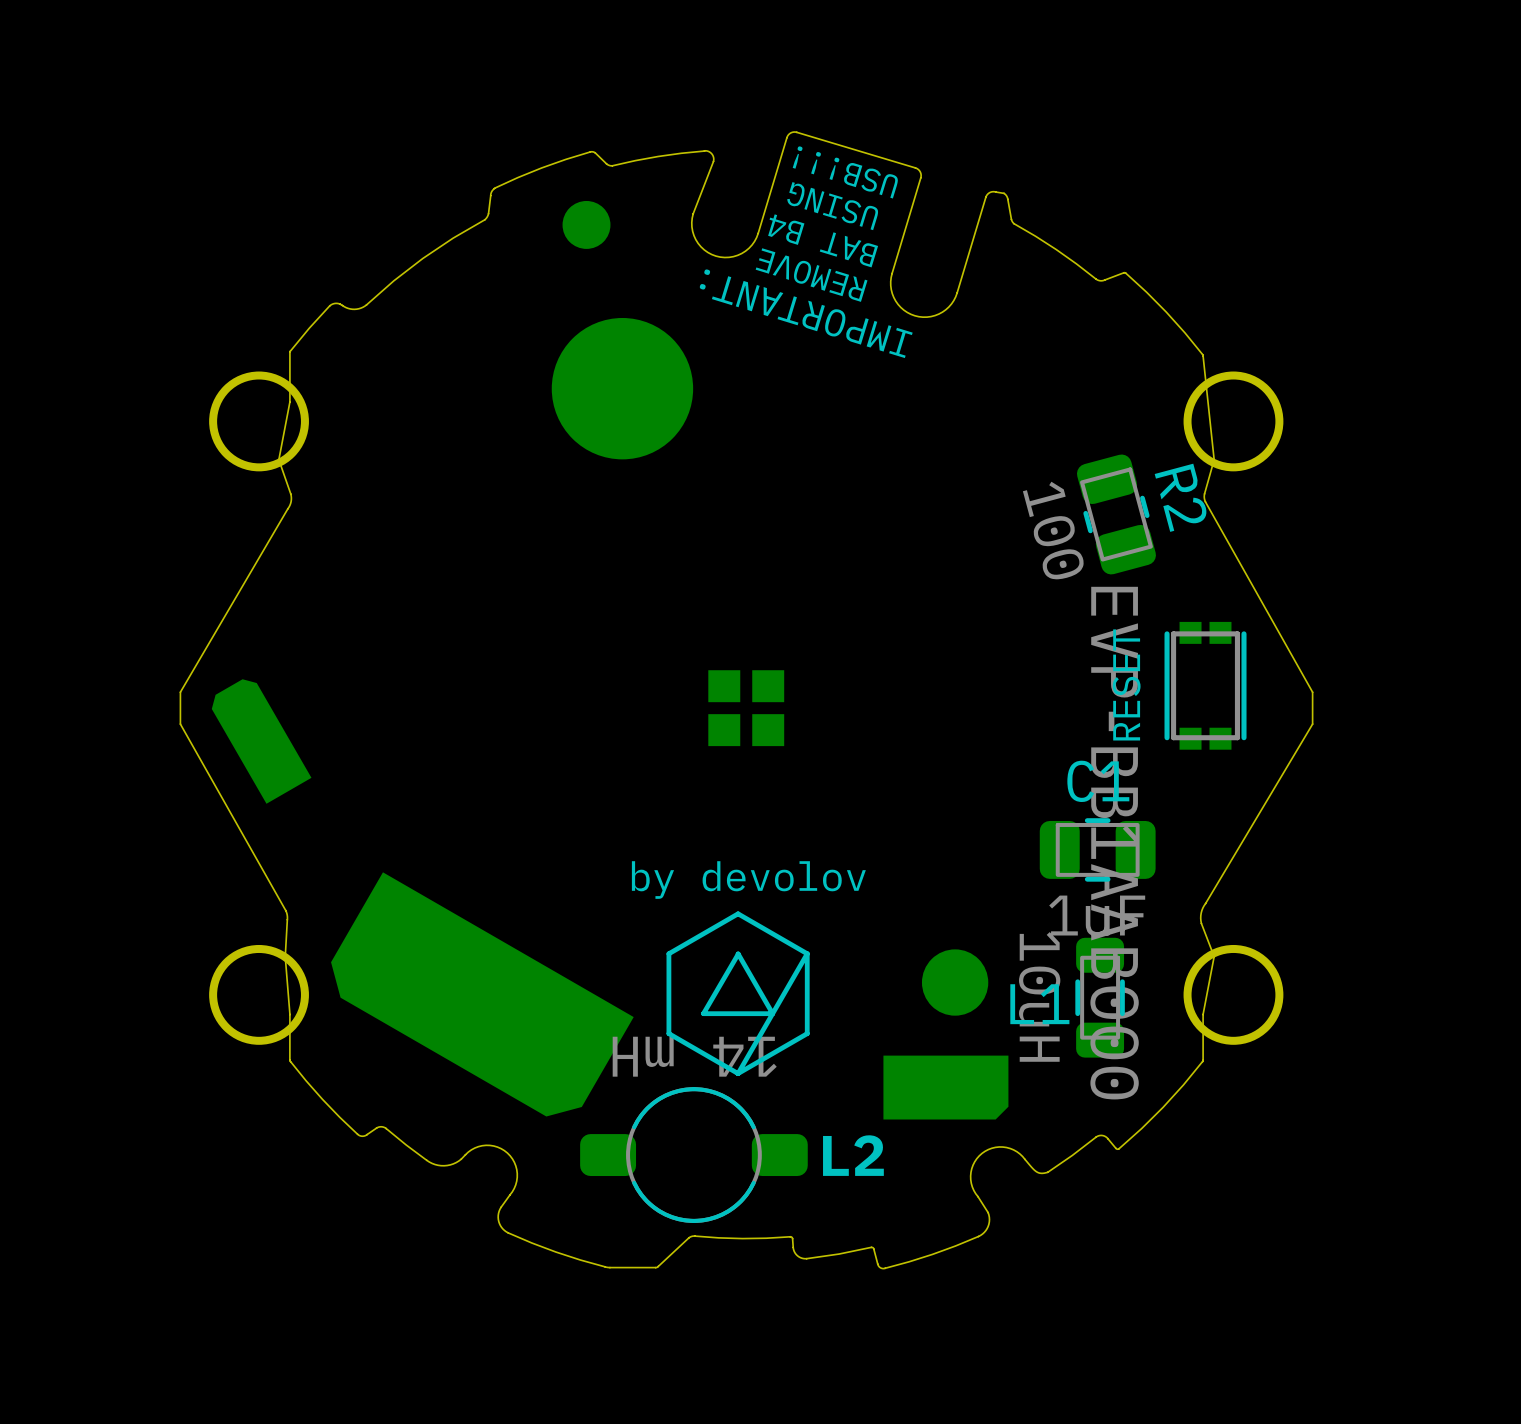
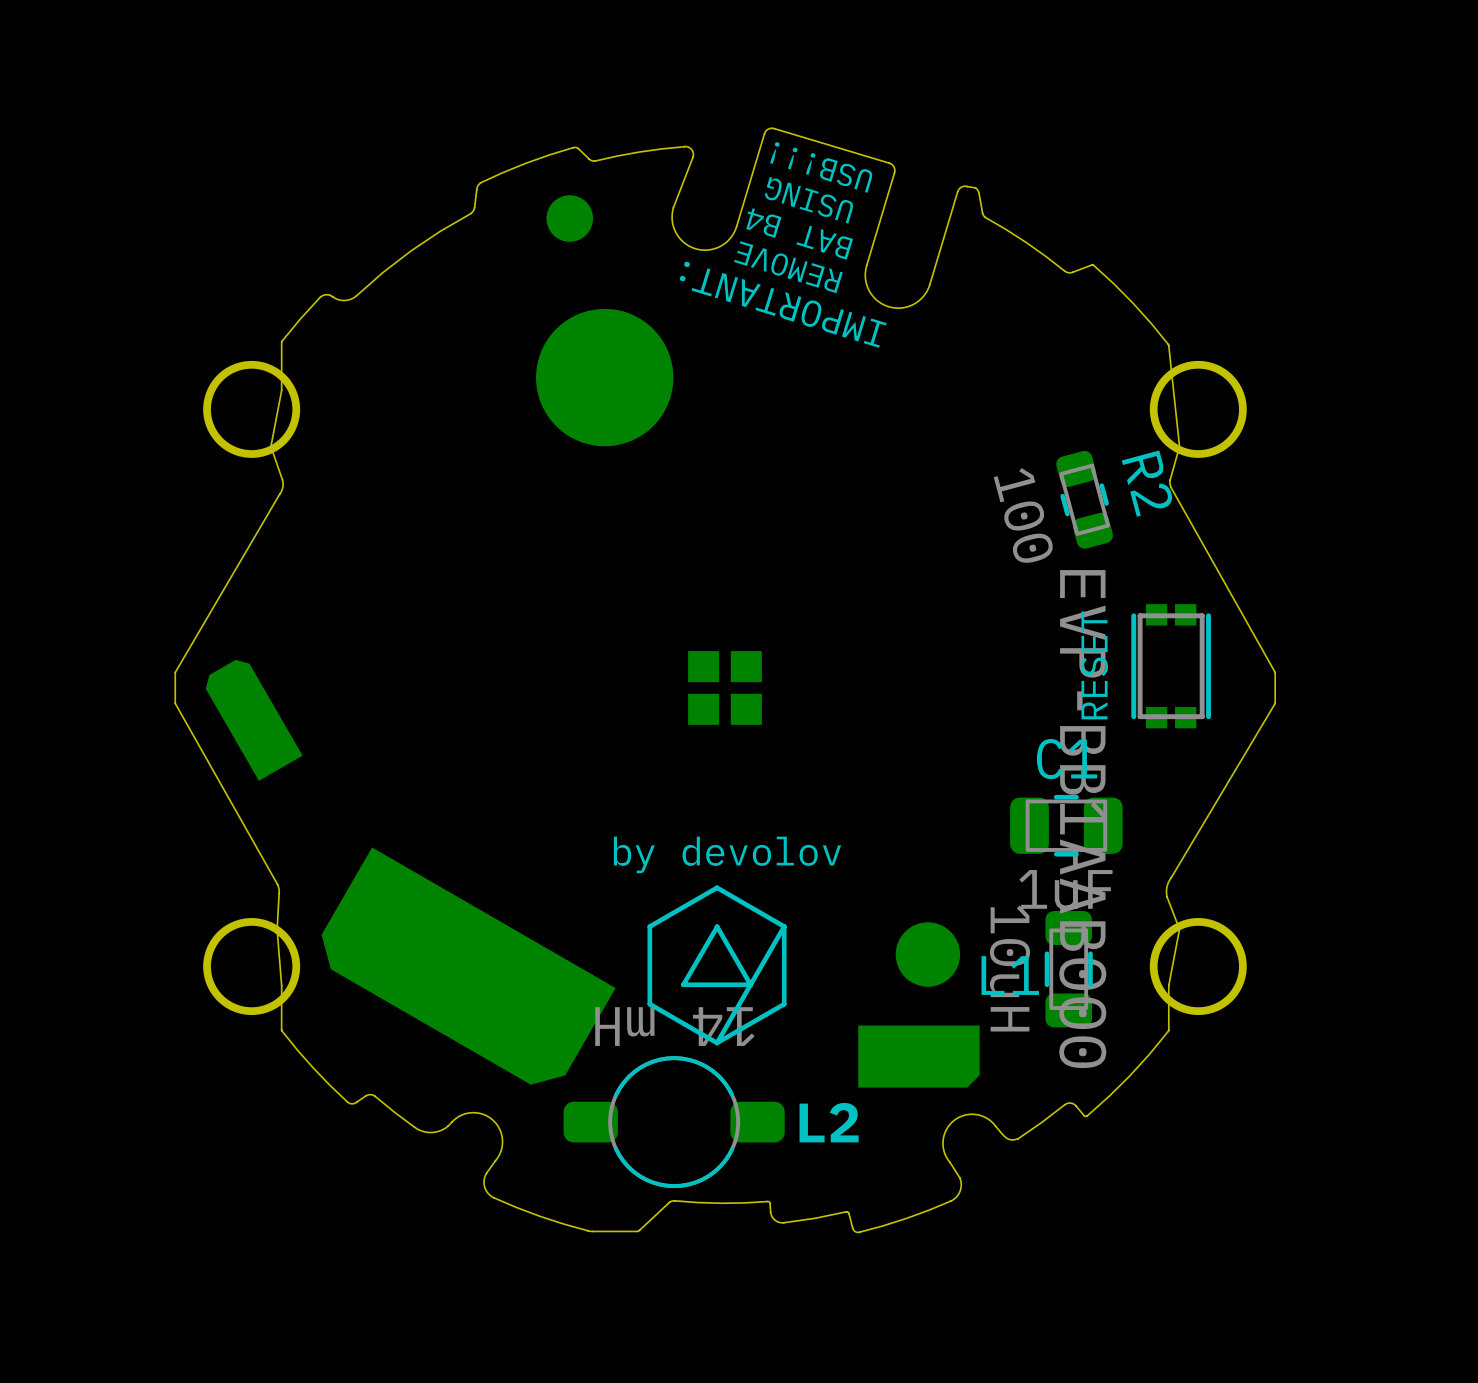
R2 footprint: [1076, 454, 1156, 575] -> [1056, 450, 1113, 549]

